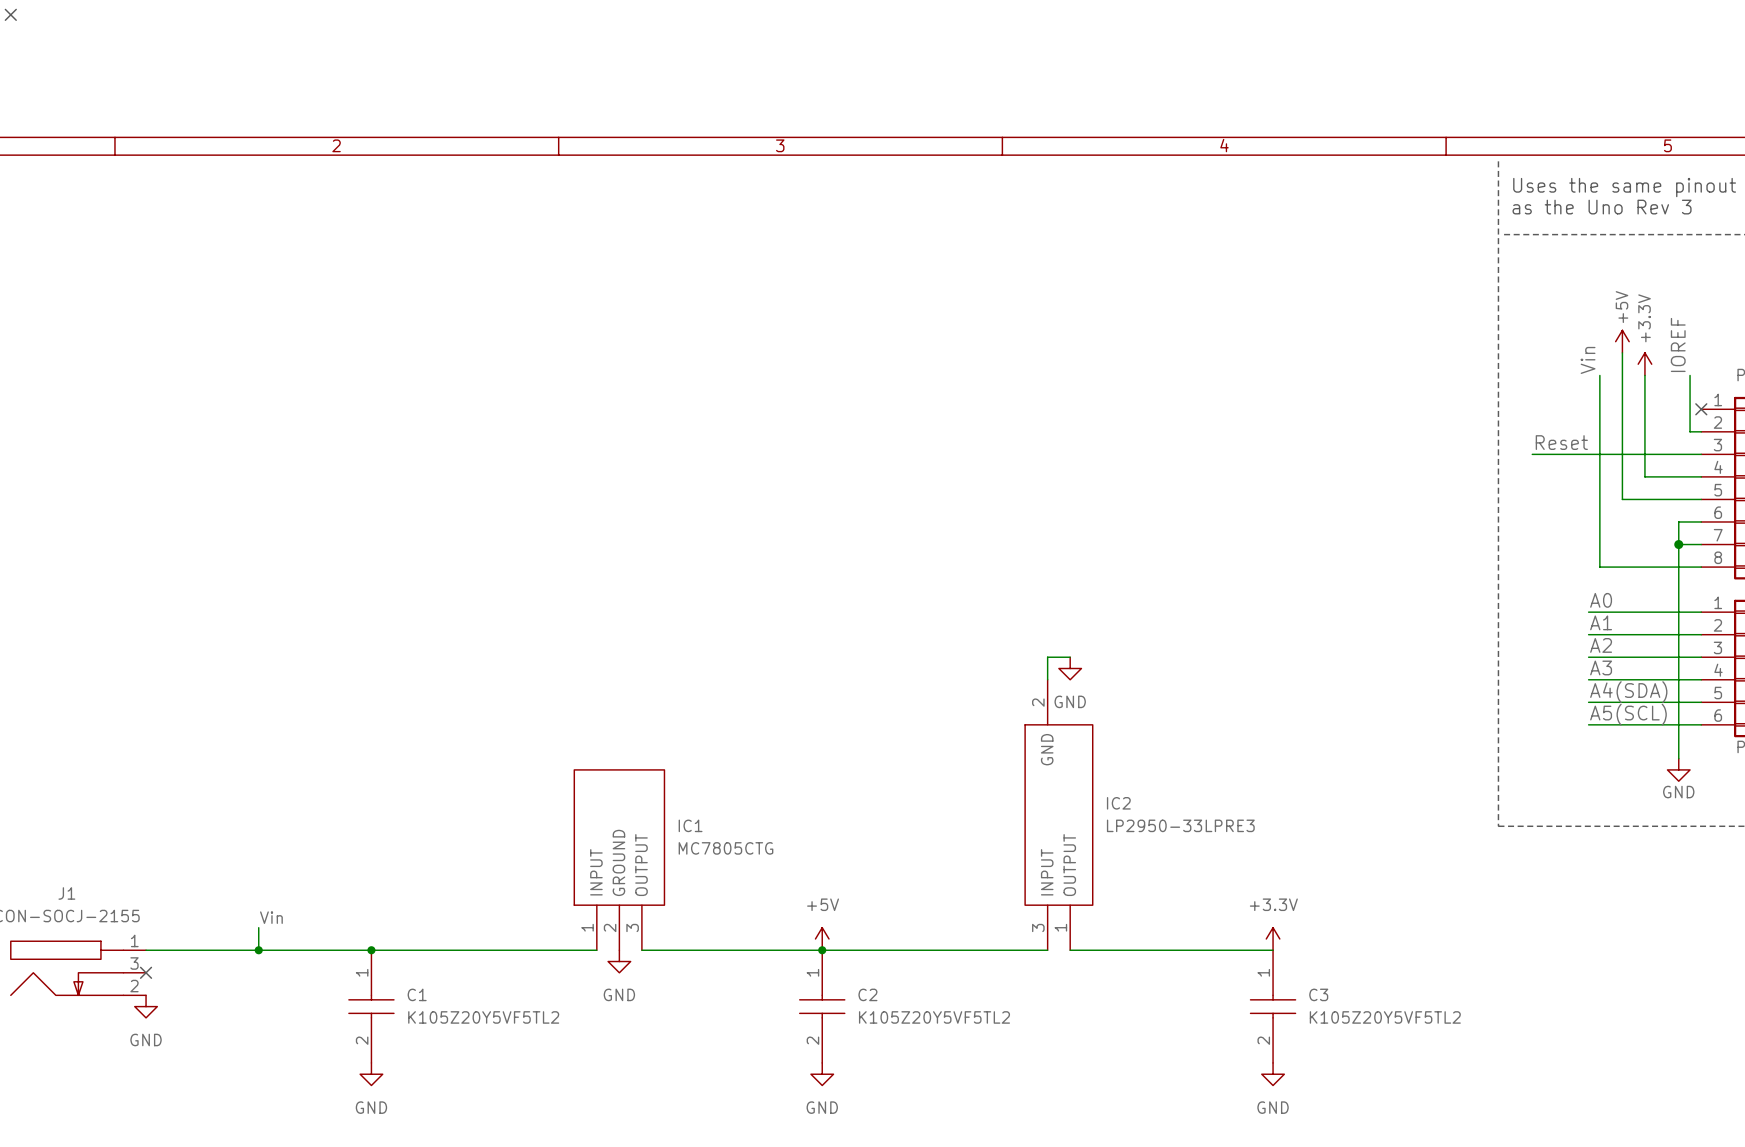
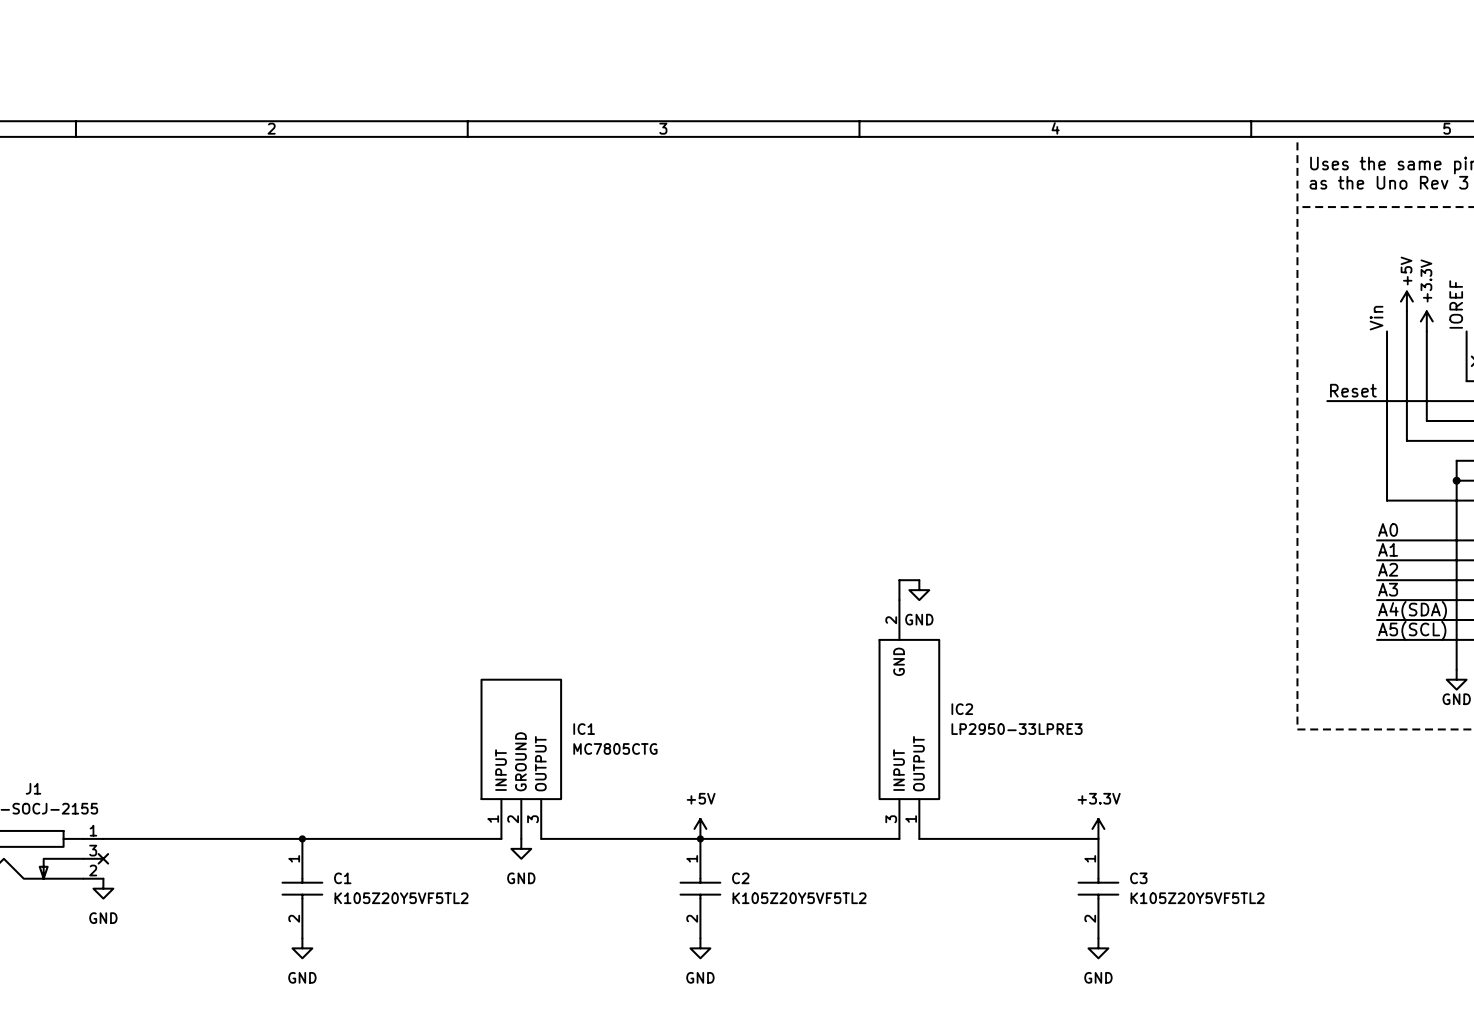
label: Vin (271, 917) -> none
wire: (258, 927) (258, 950) -> none
junction: (258, 950) -> none

